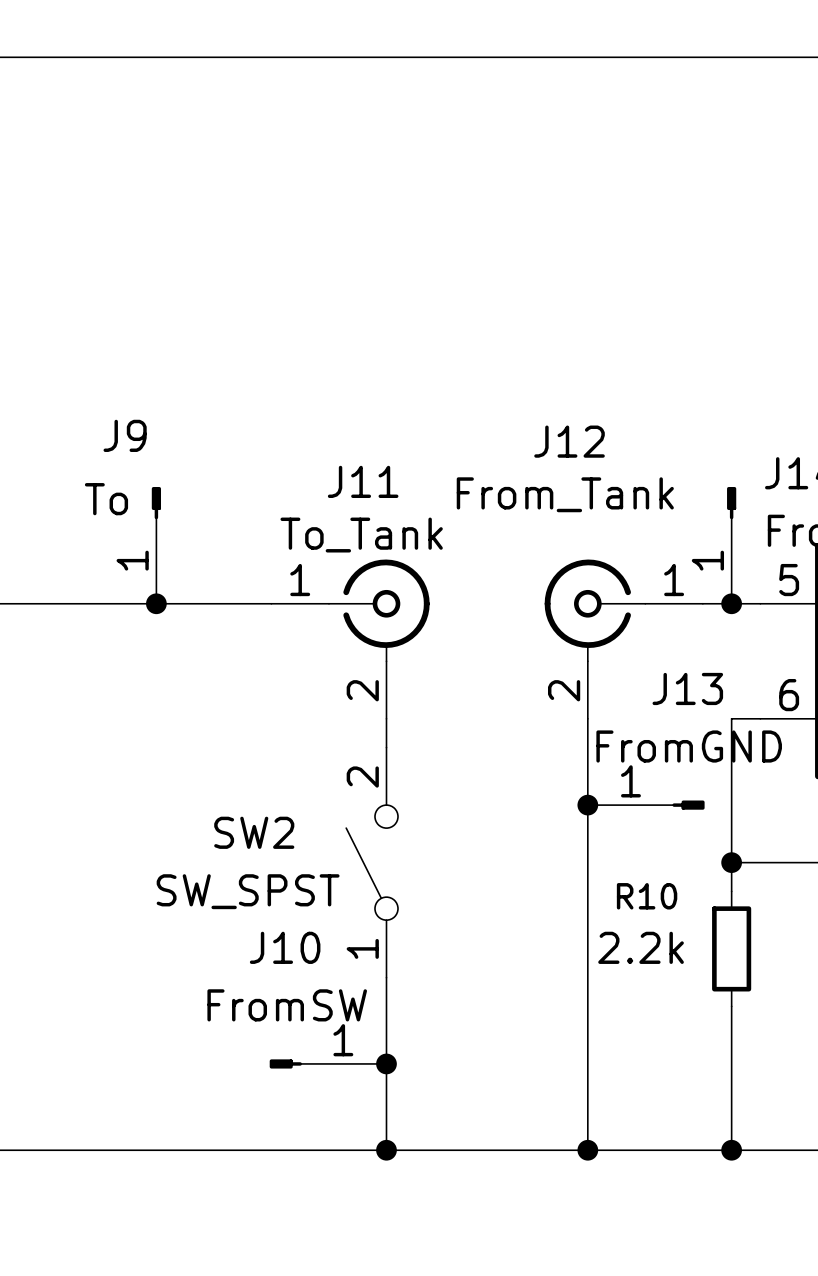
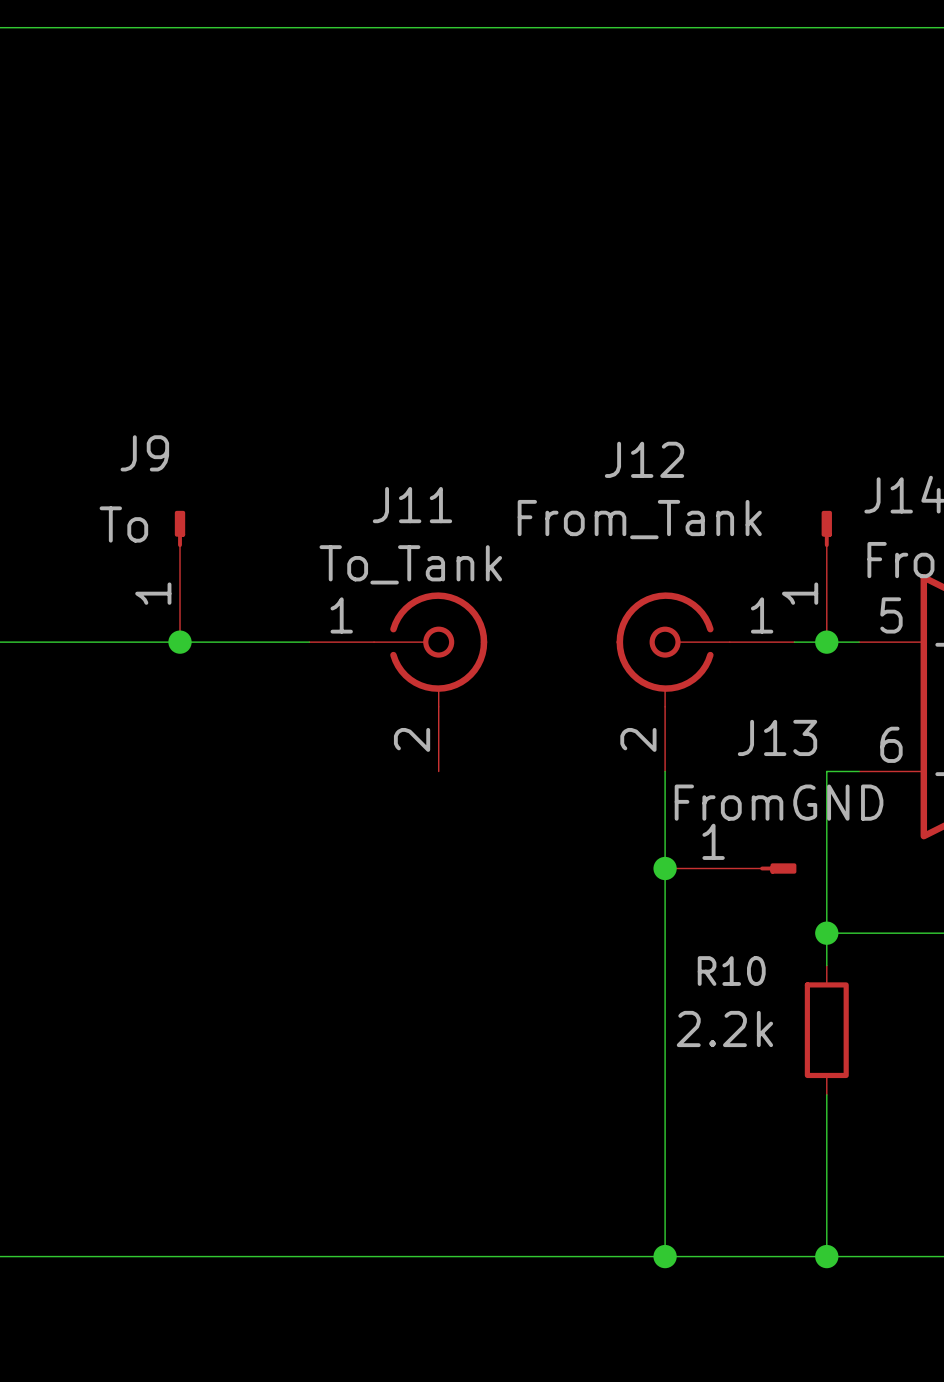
wire: (386, 718) (386, 747) -> none
SW2: SW_SPST (372, 862) -> none
wire: (386, 977) (386, 1150) -> none
J10: FromSW (328, 1063) -> none
junction: (386, 1063) -> none
junction: (386, 1150) -> none

